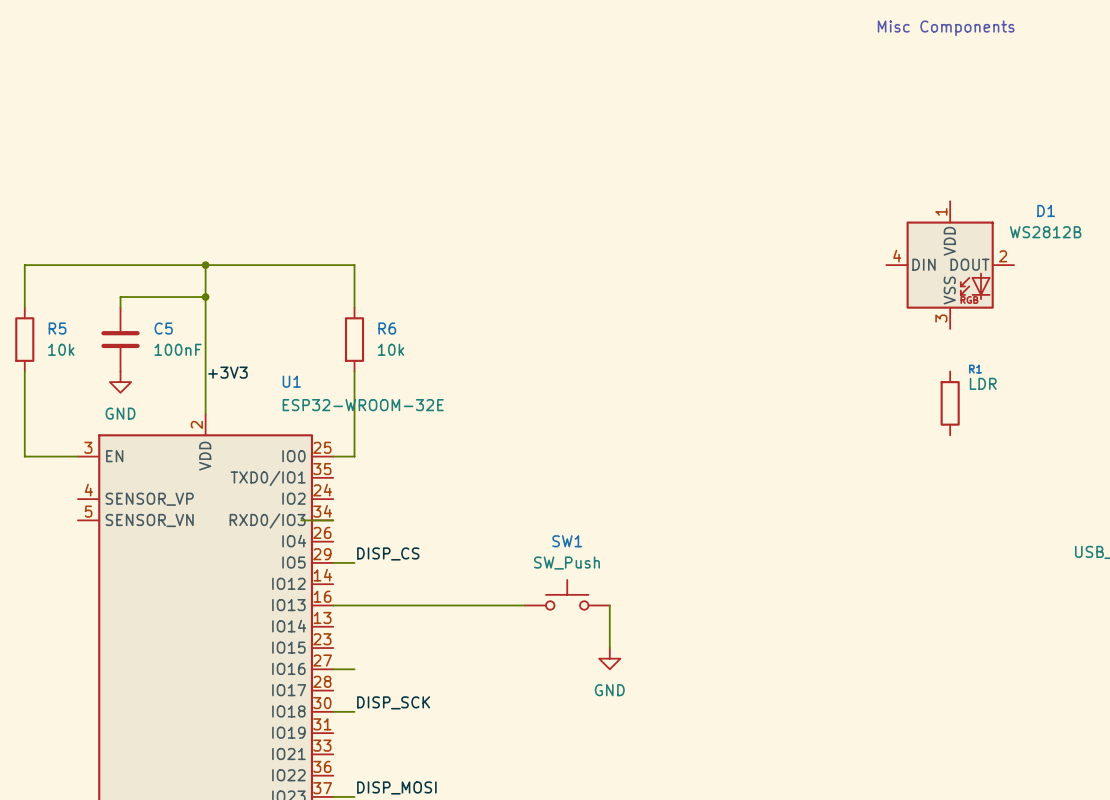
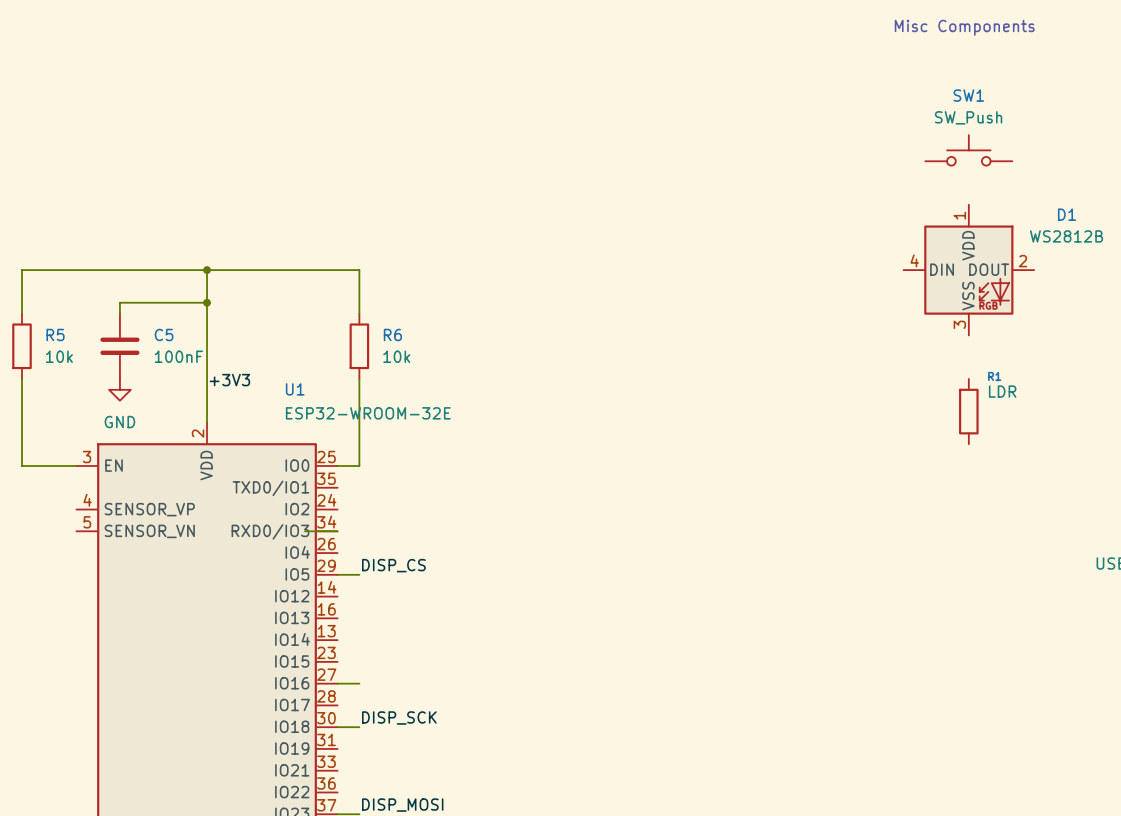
SW1 position: (567, 594) -> (968, 150)
wire: (333, 605) (524, 605) -> none
wire: (609, 605) (609, 648) -> none
power symbol: GND (609, 658) -> none

